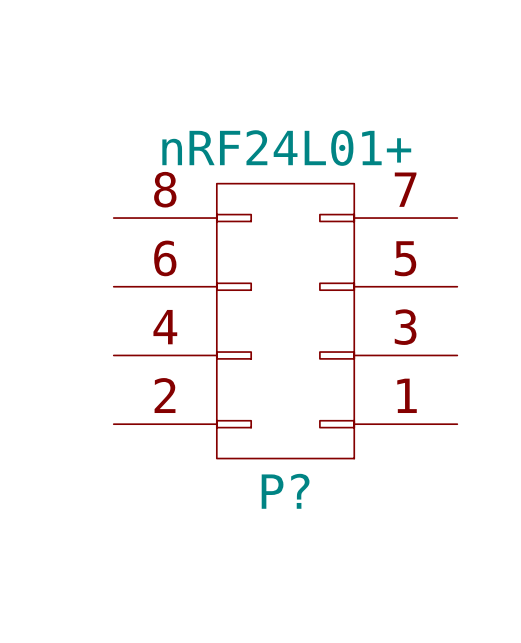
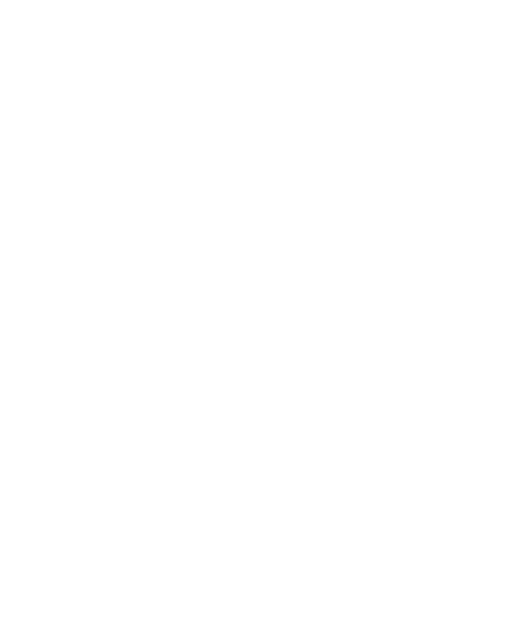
P?: nRF24L01+ (285, 321) -> none

